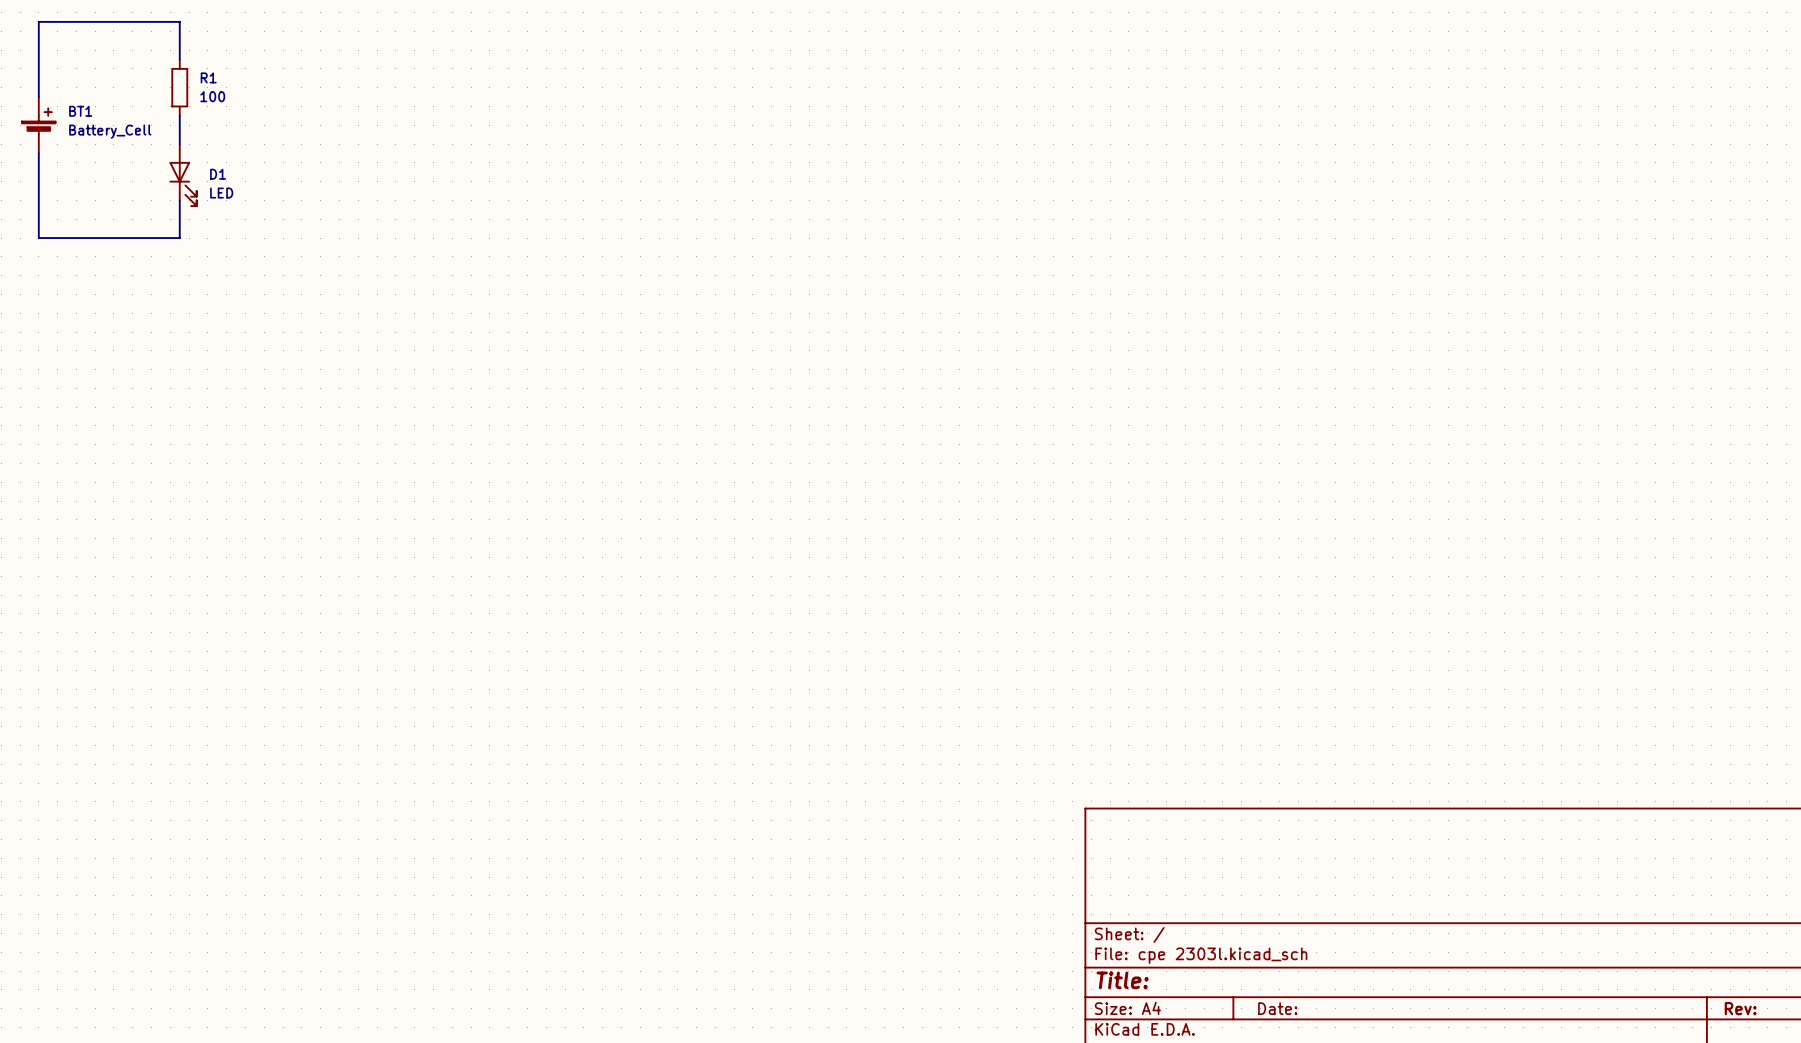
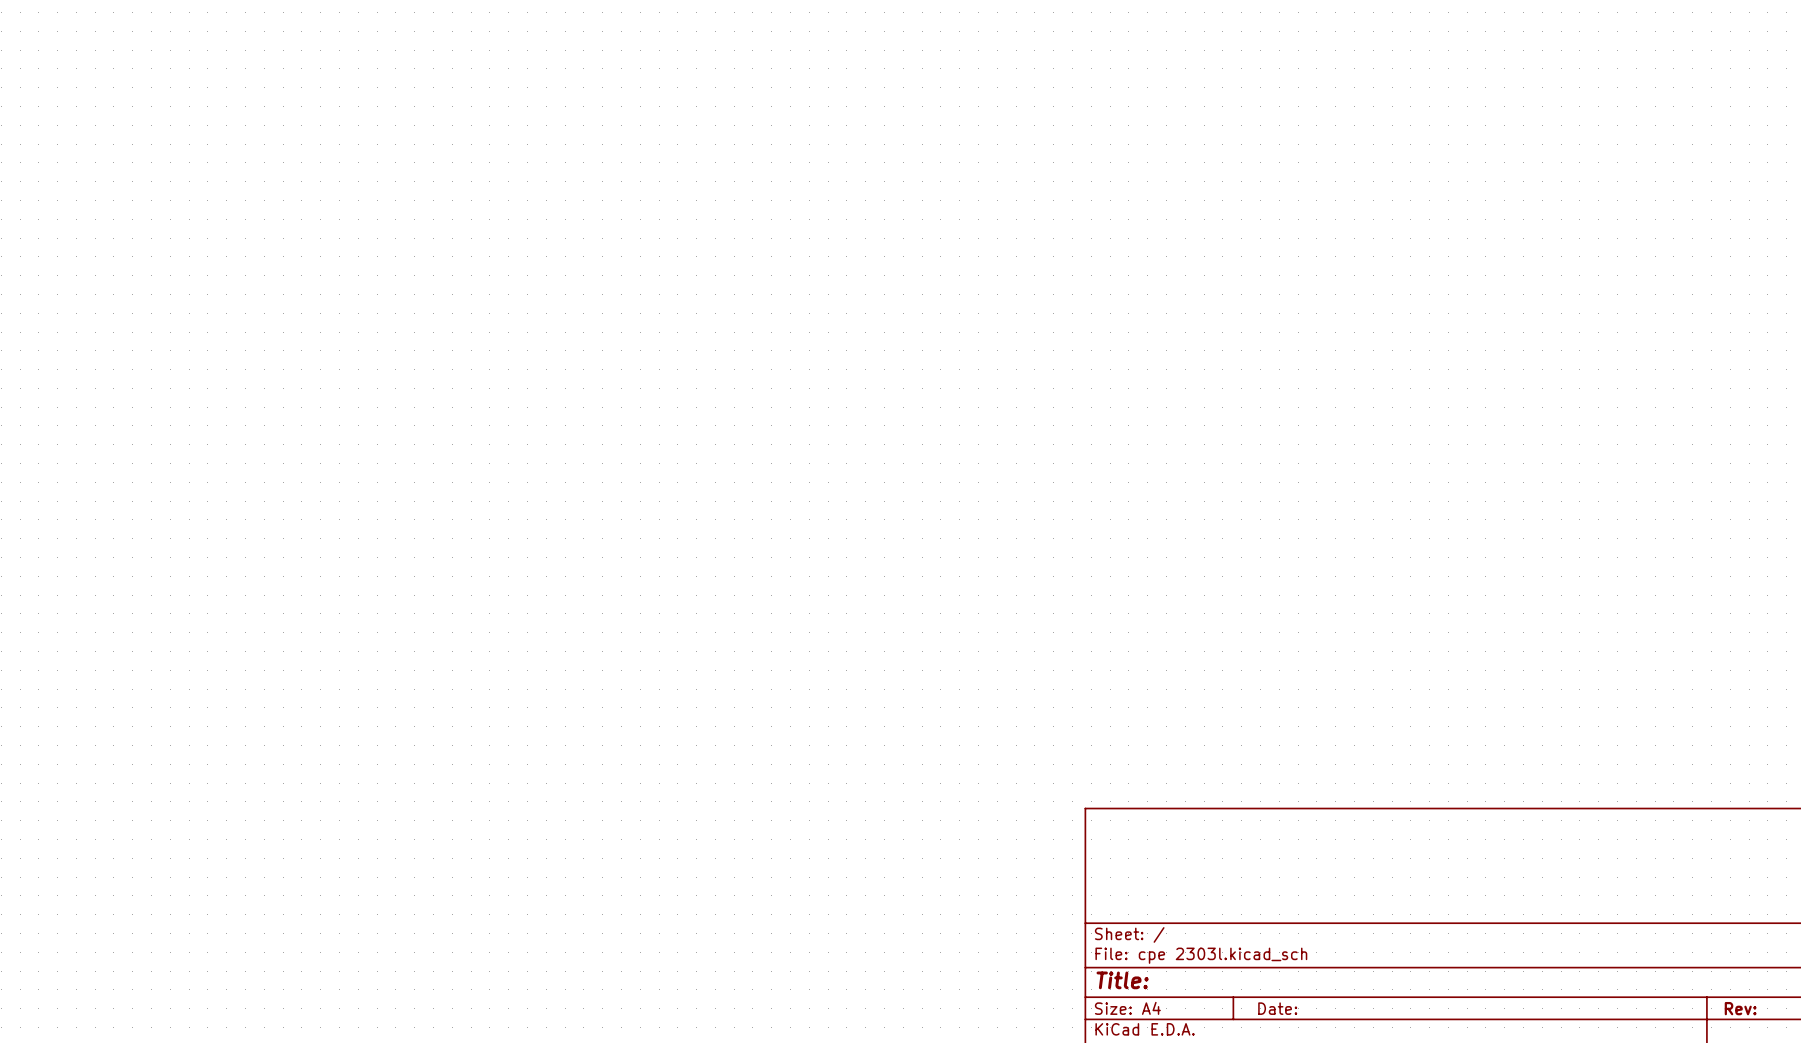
wire: (179, 59) (179, 21) (38, 21) (38, 97) -> none
R1: 100 (179, 87) -> none
wire: (179, 115) (179, 144) -> none
BT1: Battery_Cell (38, 125) -> none
wire: (38, 153) (38, 238) (179, 238) (179, 200) -> none
D1: LED (183, 175) -> none

